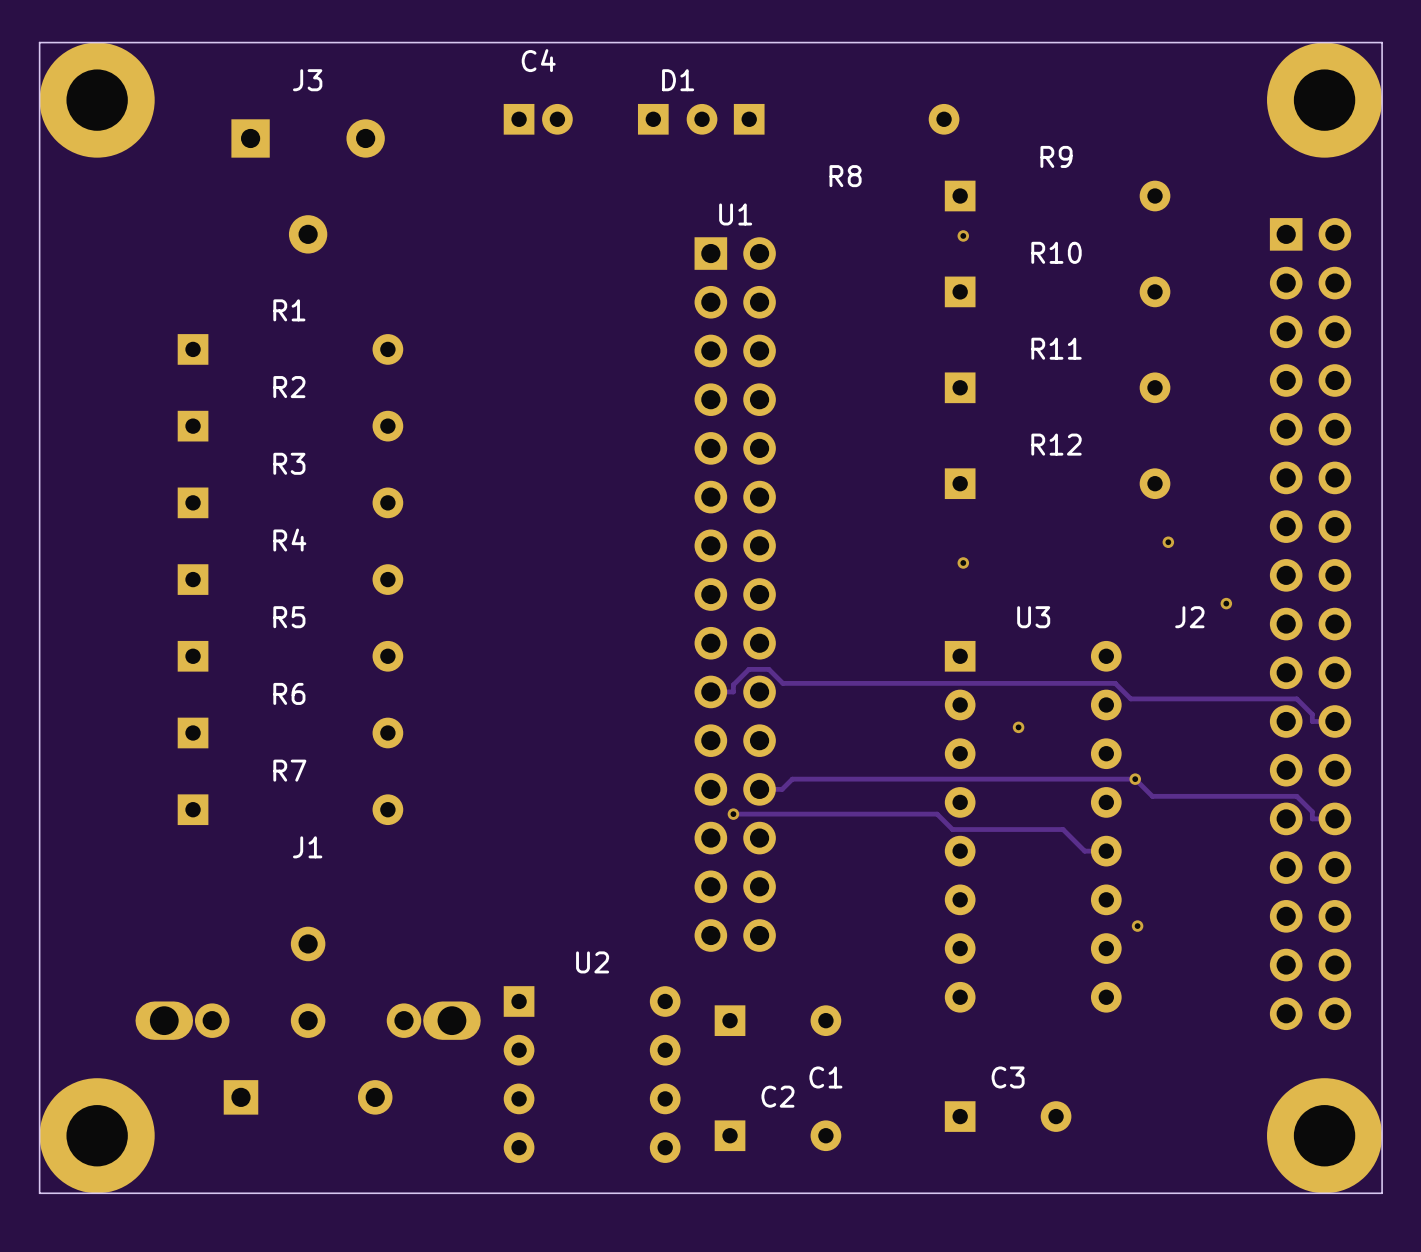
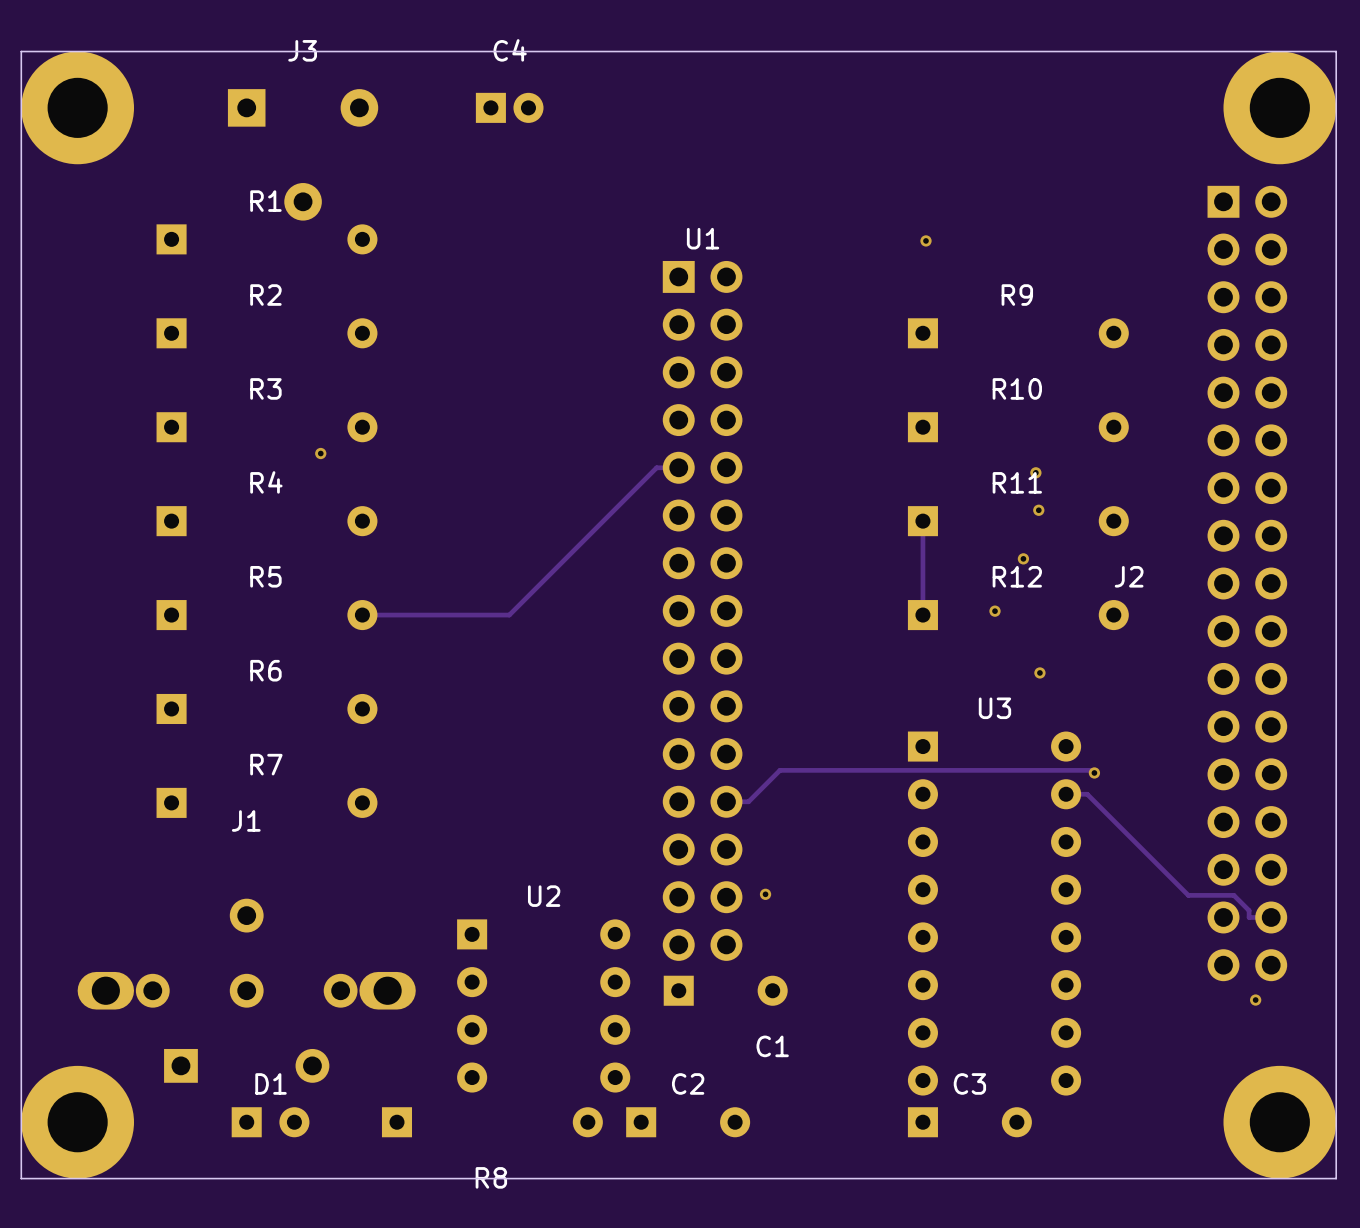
C4 position: (538, 119) -> (509, 107)
D1 position: (677, 119) -> (270, 1122)
R8 position: (846, 119) -> (492, 1122)
J3 position: (308, 186) -> (303, 154)
R9 position: (1057, 196) -> (1018, 333)
R10 position: (1057, 291) -> (1018, 427)
R2: none -> (267, 333)
R1 position: (290, 349) -> (267, 239)
R2 name: R2 (289, 387) -> R3 (265, 388)
R11 position: (1057, 387) -> (1018, 521)
via: none -> (320, 453)
track: none -> (678, 467) (656, 467) (509, 615) (362, 615)
via: none -> (1035, 472)
R12 position: (1057, 483) -> (1018, 615)
R3: (290, 502) -> none
via: none -> (1038, 510)
track: none -> (922, 521) (922, 615)
via: (1168, 542) -> none
via: none -> (1023, 558)
via: (963, 562) -> none
R4 position: (290, 579) -> (267, 521)
U1 position: (735, 594) -> (702, 610)
via: (1226, 603) -> none
via: none -> (995, 611)
J2 position: (1310, 624) -> (1247, 583)
R5 position: (290, 656) -> (267, 615)
via: none -> (1039, 672)
track: (710, 691) (733, 691) (733, 684) (748, 669) (768, 669) (782, 683) (1115, 683) (1130, 698) (1296, 698) (1312, 714) (1312, 721) (1334, 721) -> none
via: (1018, 727) -> none
R6 position: (290, 732) -> (267, 708)
track: none -> (1094, 770) (779, 770) (748, 801) (726, 801)
track: (759, 789) (782, 789) (792, 779) (1135, 779) (1152, 796) (1296, 796) (1312, 811) (1312, 818) (1334, 818) -> none
track: none -> (1066, 794) (1087, 794) (1188, 895) (1233, 895) (1249, 910) (1249, 917) (1271, 917)
track: (733, 814) (937, 814) (952, 829) (1063, 829) (1084, 851) (1106, 851) -> none
via position: (733, 814) -> (765, 894)
U3 position: (1033, 826) -> (994, 913)
via: (1137, 926) -> none
via: none -> (1255, 1000)
J1 position: (308, 1020) -> (246, 990)
C1 position: (777, 1020) -> (725, 990)
U2 position: (592, 1074) -> (543, 1005)
C3 position: (1008, 1116) -> (969, 1122)
C2 position: (777, 1135) -> (688, 1122)

